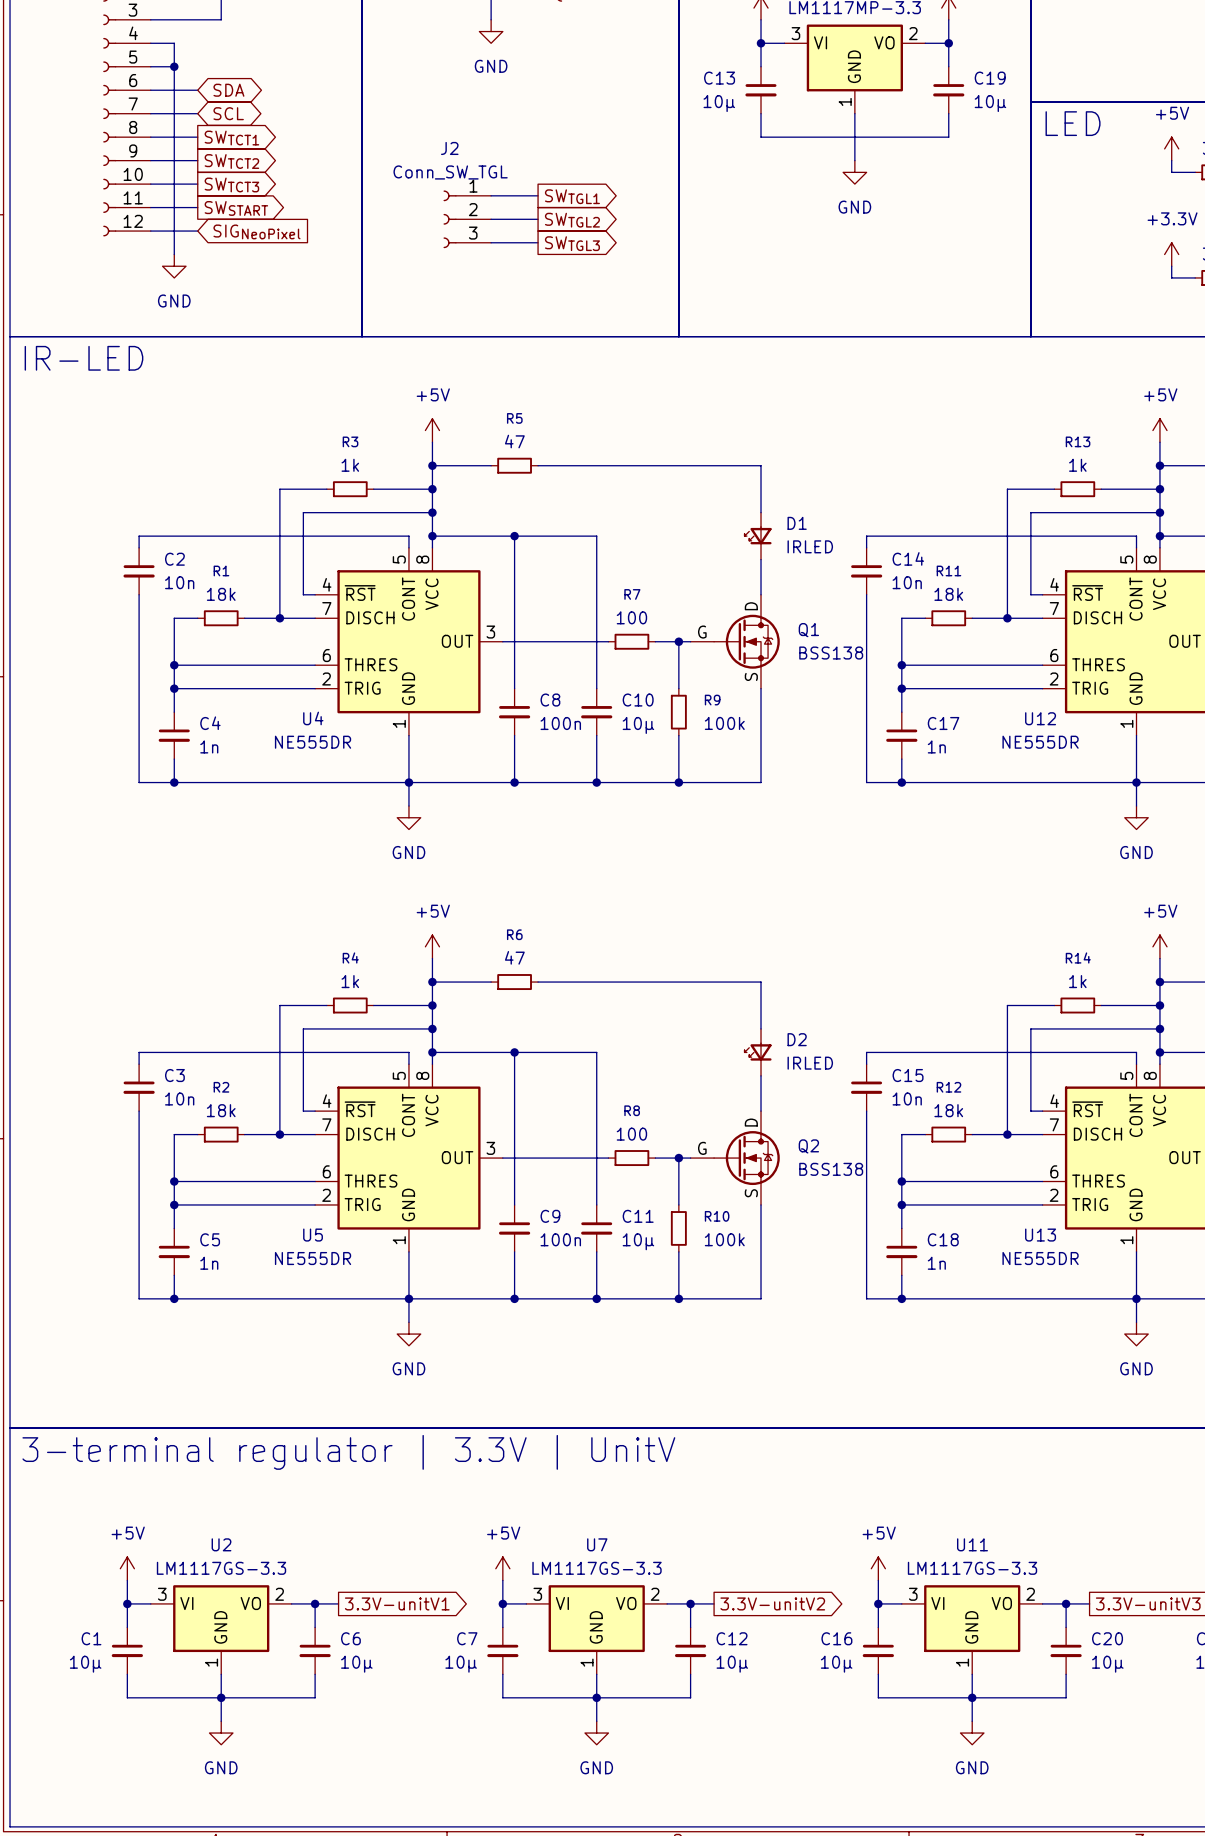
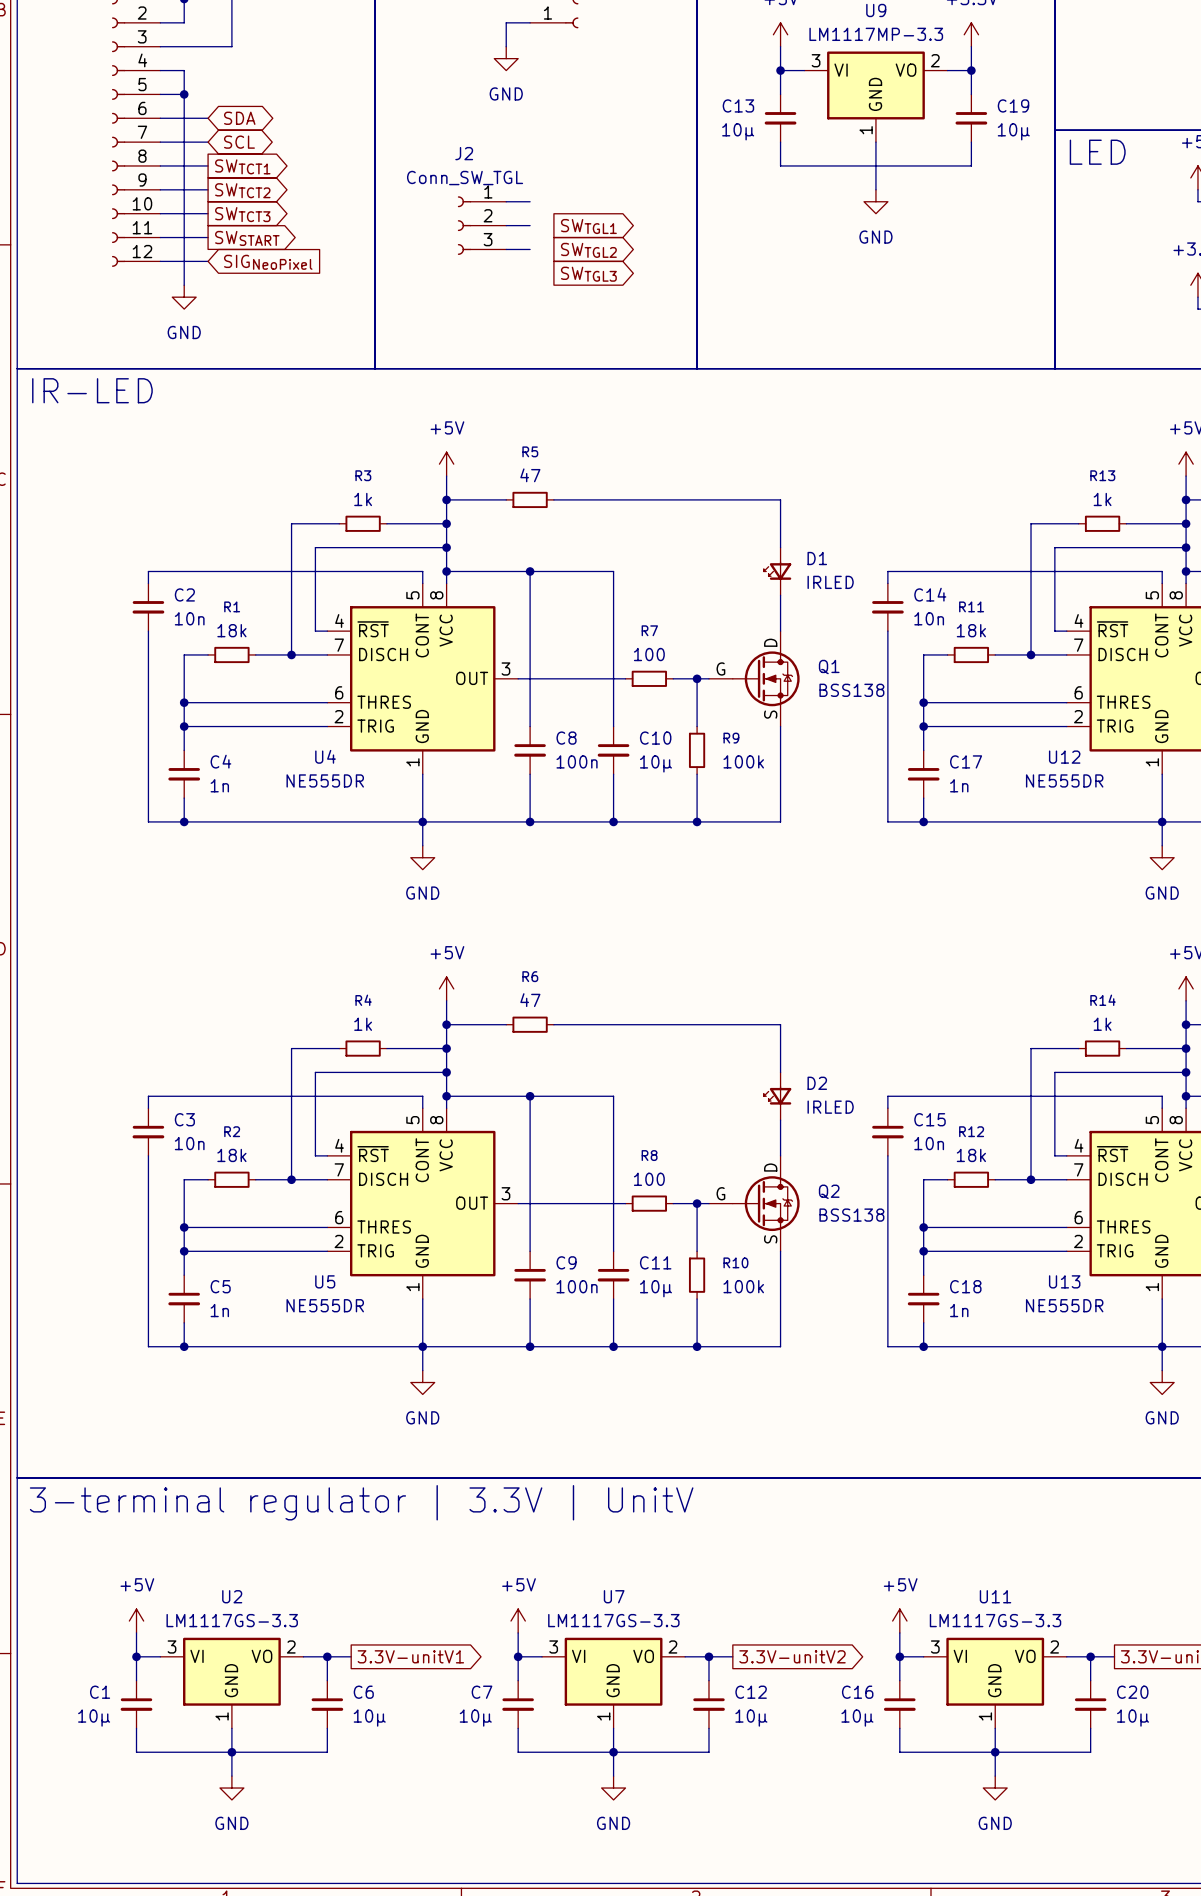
wire: (514, 195) (538, 195) -> (506, 201) (530, 201)
J2 position: (467, 219) -> (482, 225)
wire: (514, 219) (538, 219) -> none
wire: (491, 242) (538, 242) -> none

